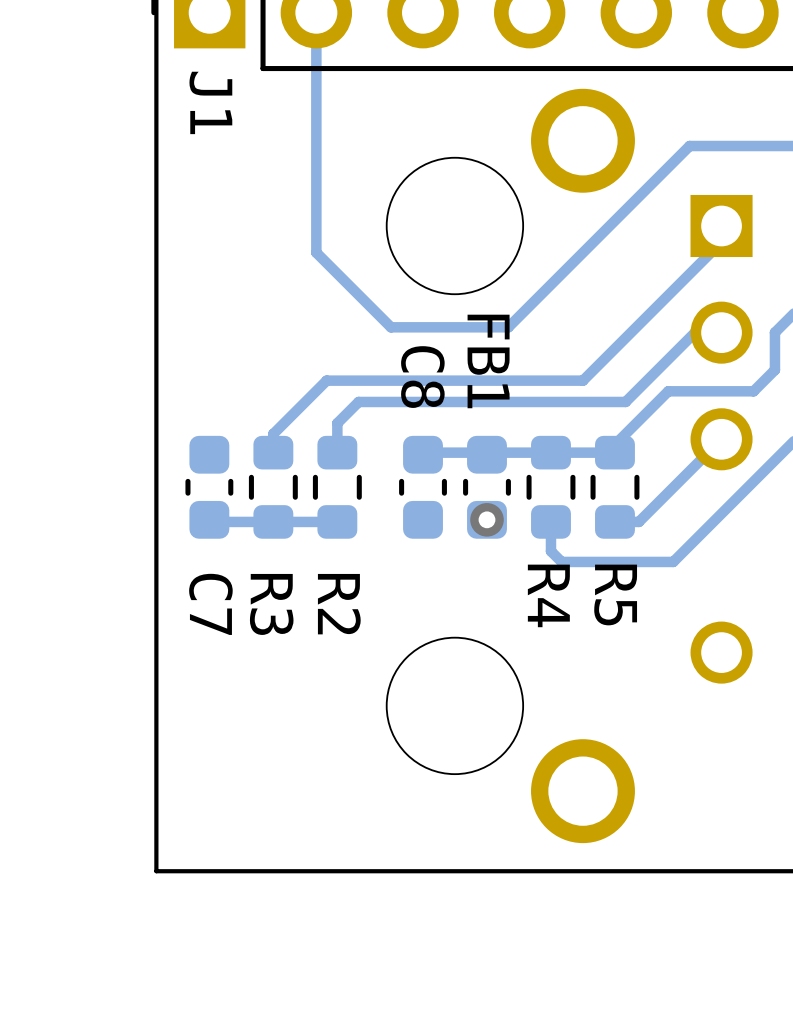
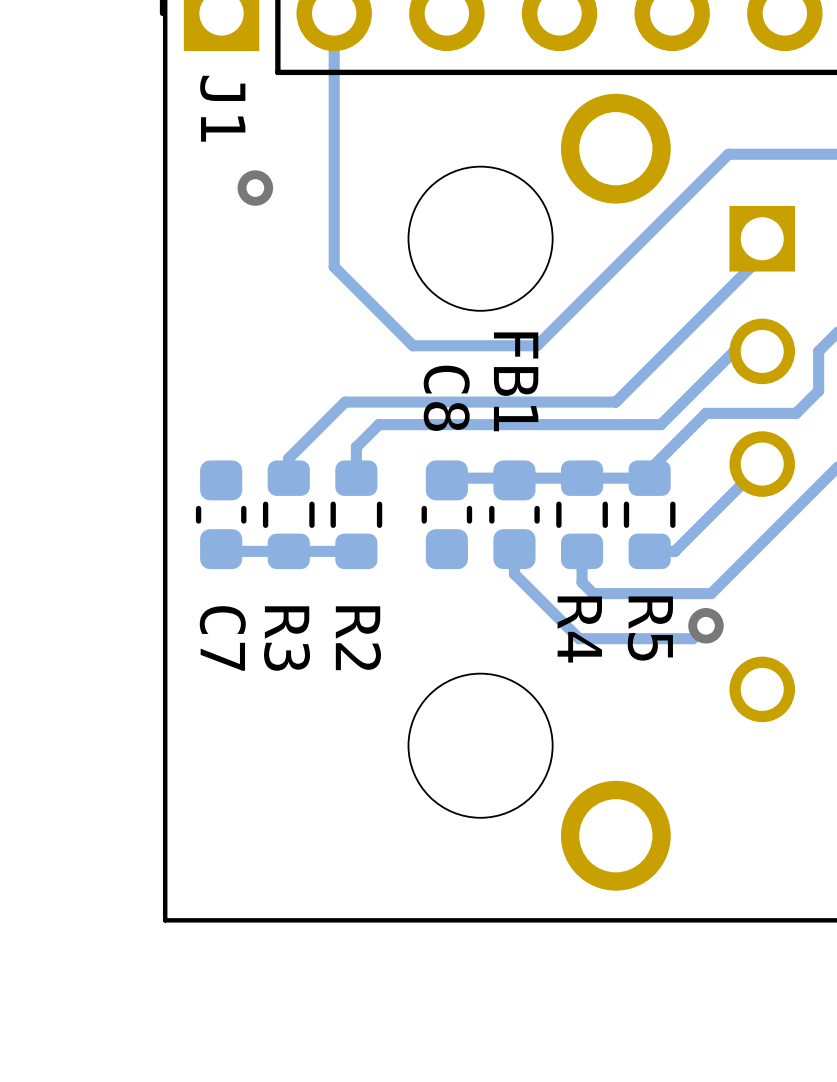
via: none -> (255, 188)
track: none -> (514, 549) (514, 574) (579, 638) (693, 638) (705, 625)
via position: (487, 519) -> (705, 625)

